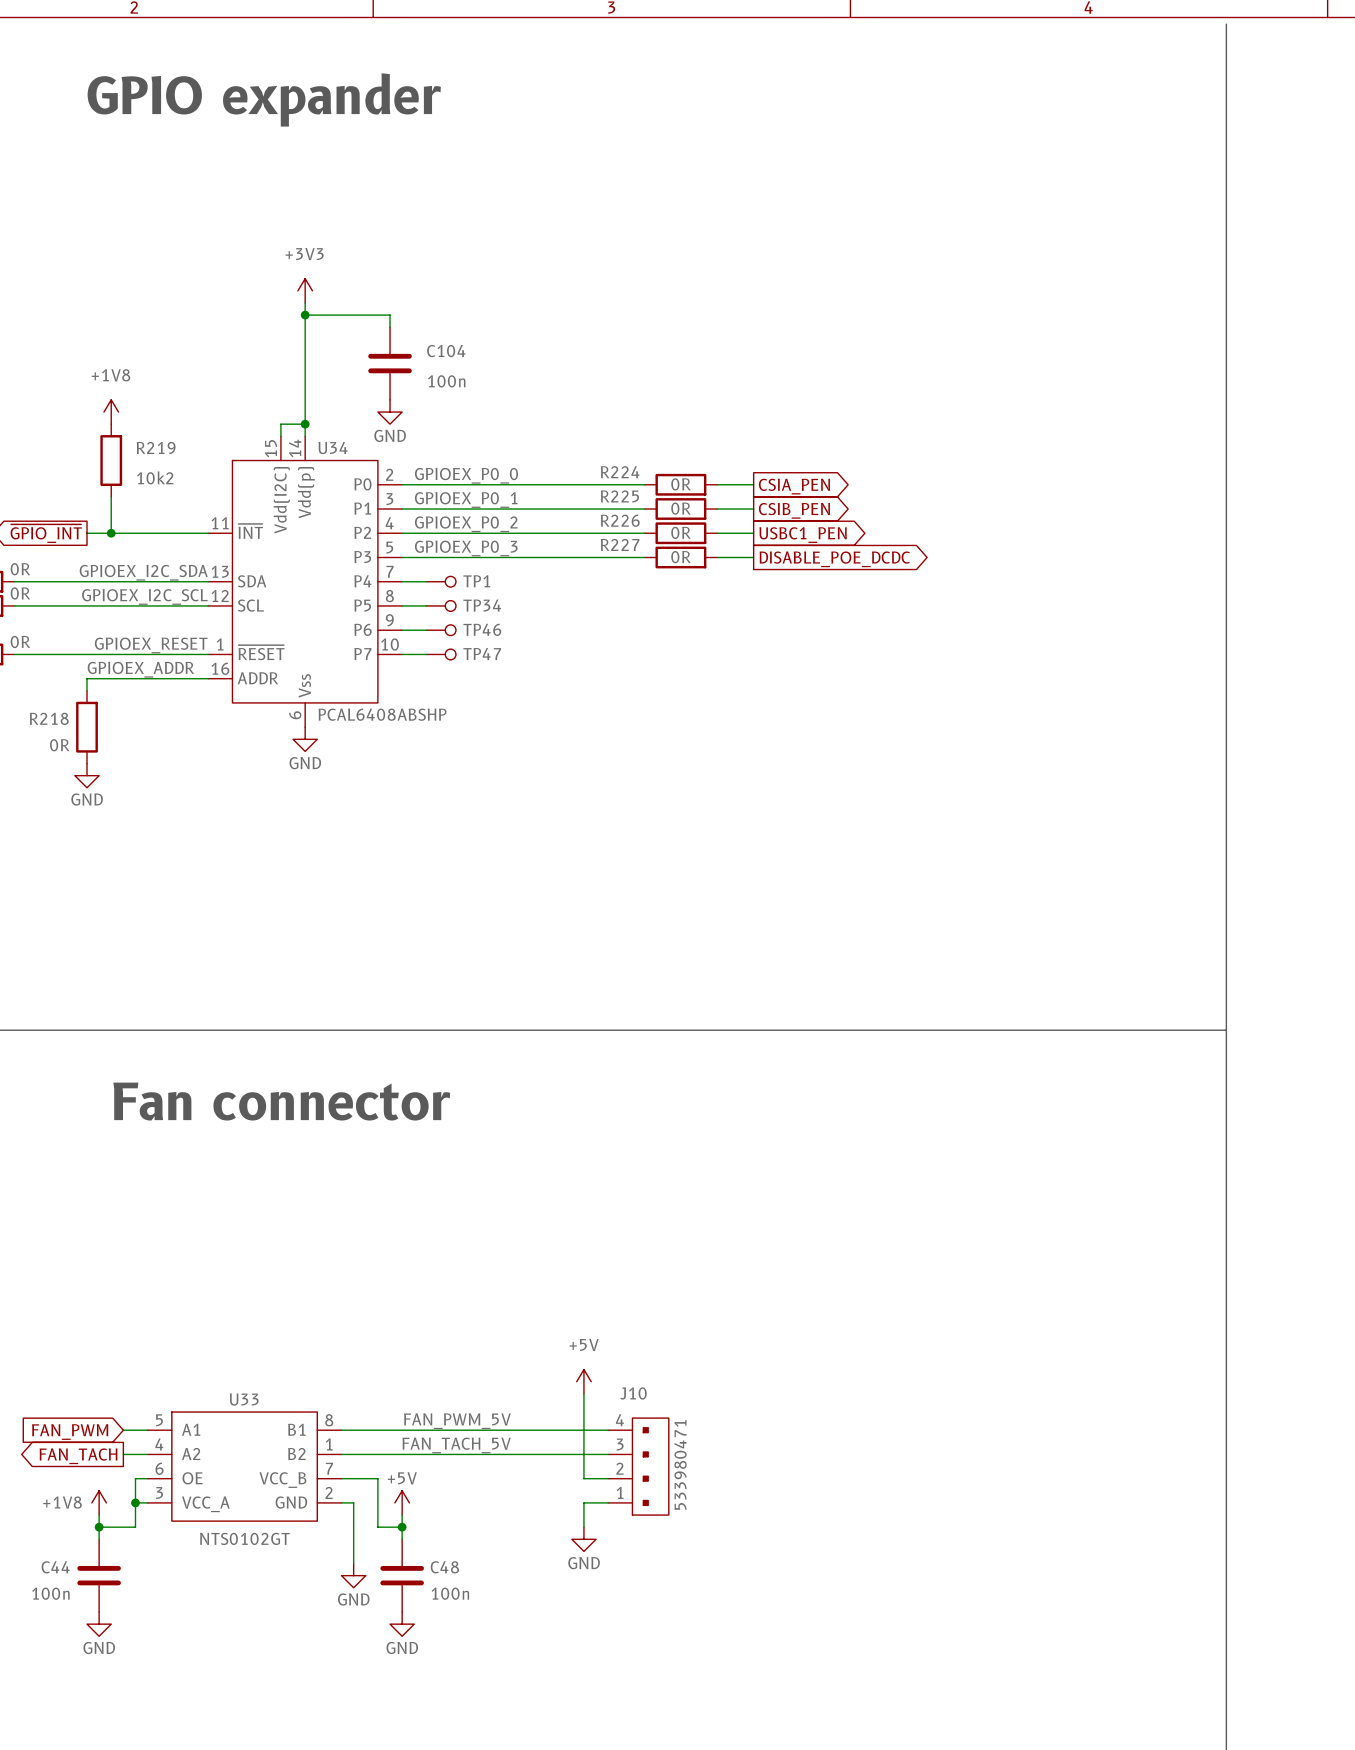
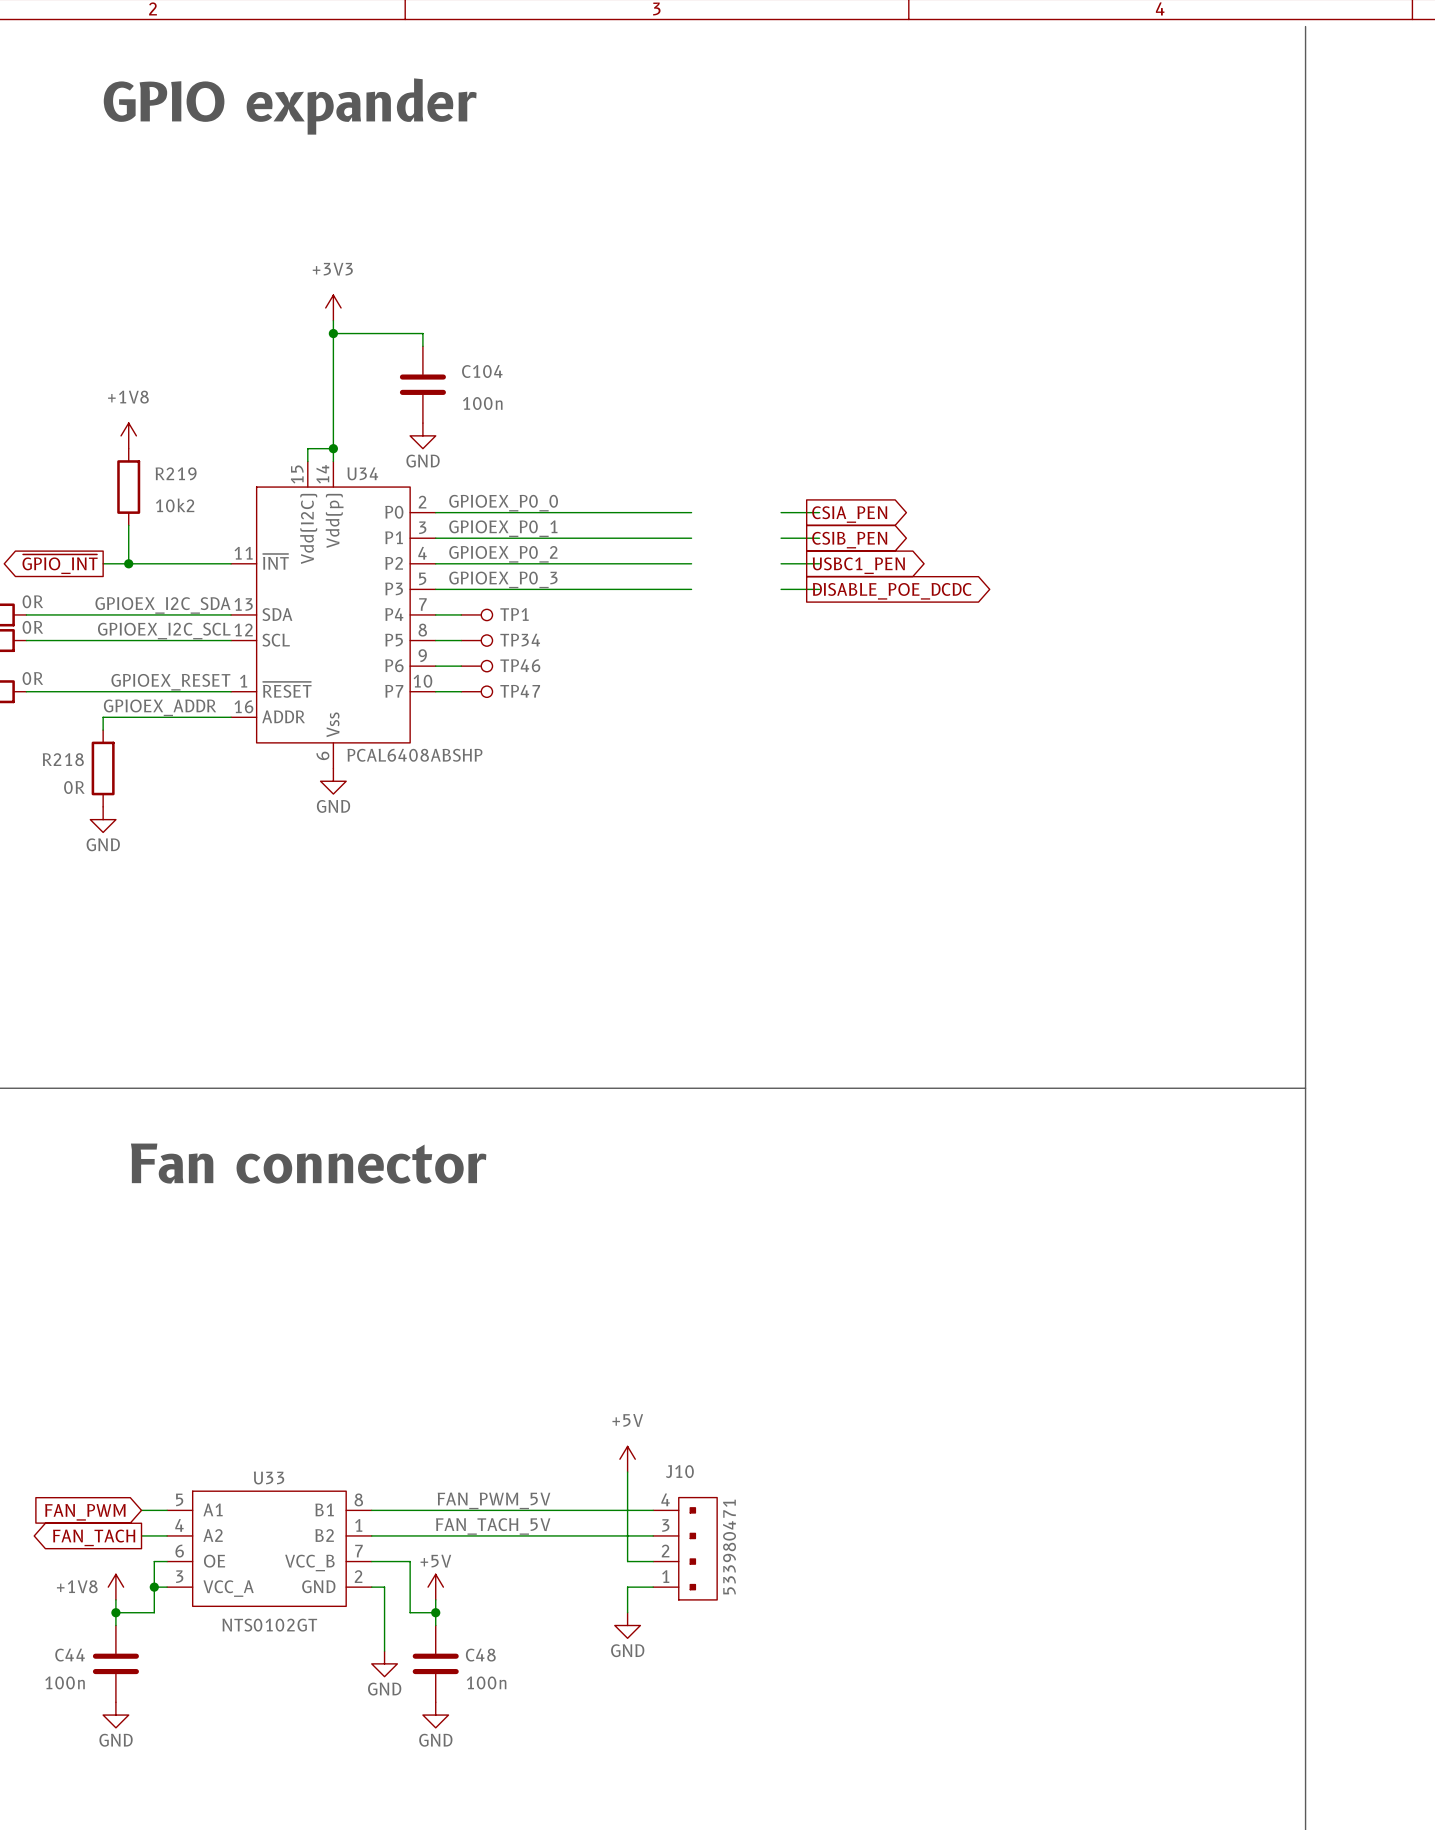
R224: (680, 484) -> none
wire: (717, 484) (729, 484) -> (806, 512) (819, 512)
R225: (680, 509) -> none
wire: (717, 509) (729, 509) -> (806, 538) (819, 538)
R226: (680, 533) -> none
wire: (717, 533) (729, 533) -> (806, 563) (819, 563)
R227: (680, 557) -> none
wire: (717, 557) (729, 557) -> (806, 589) (819, 589)

